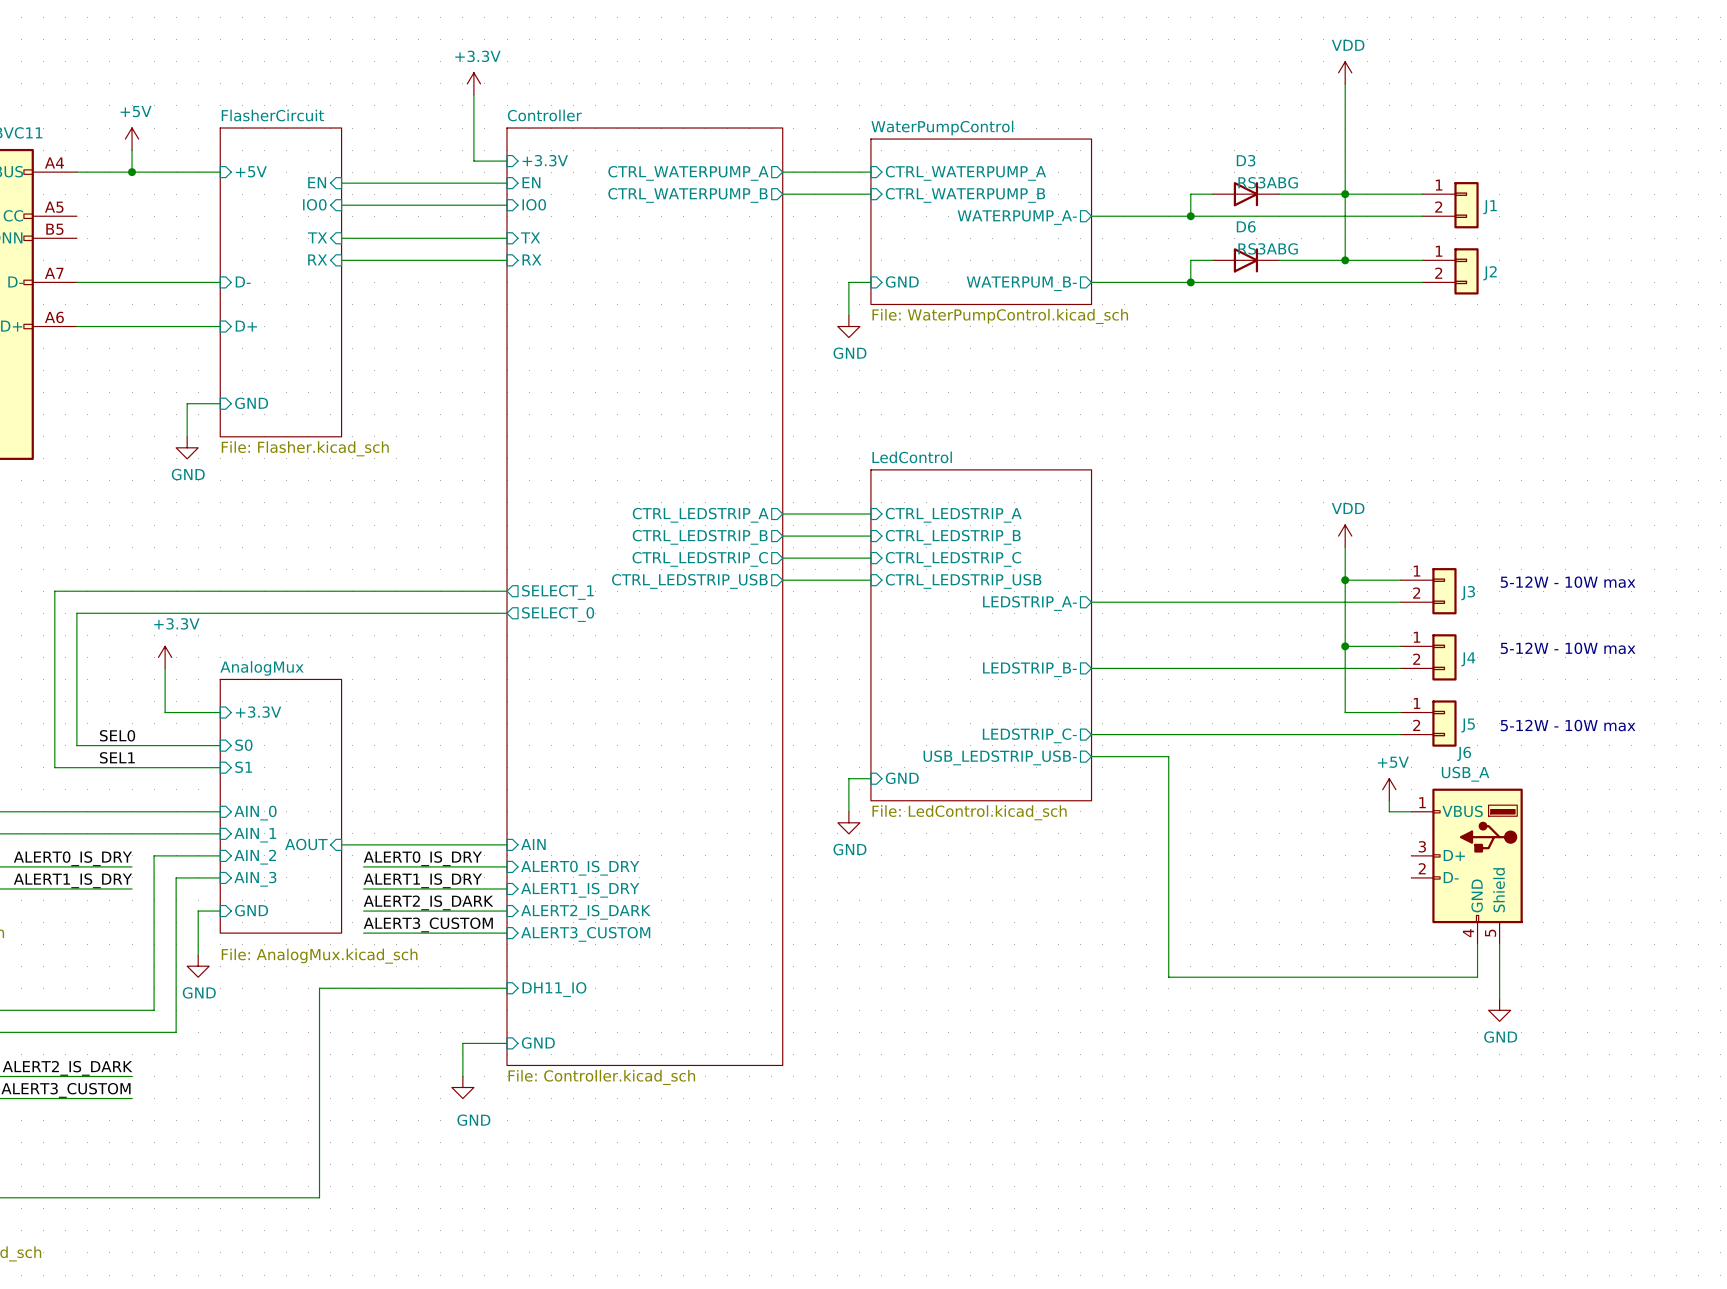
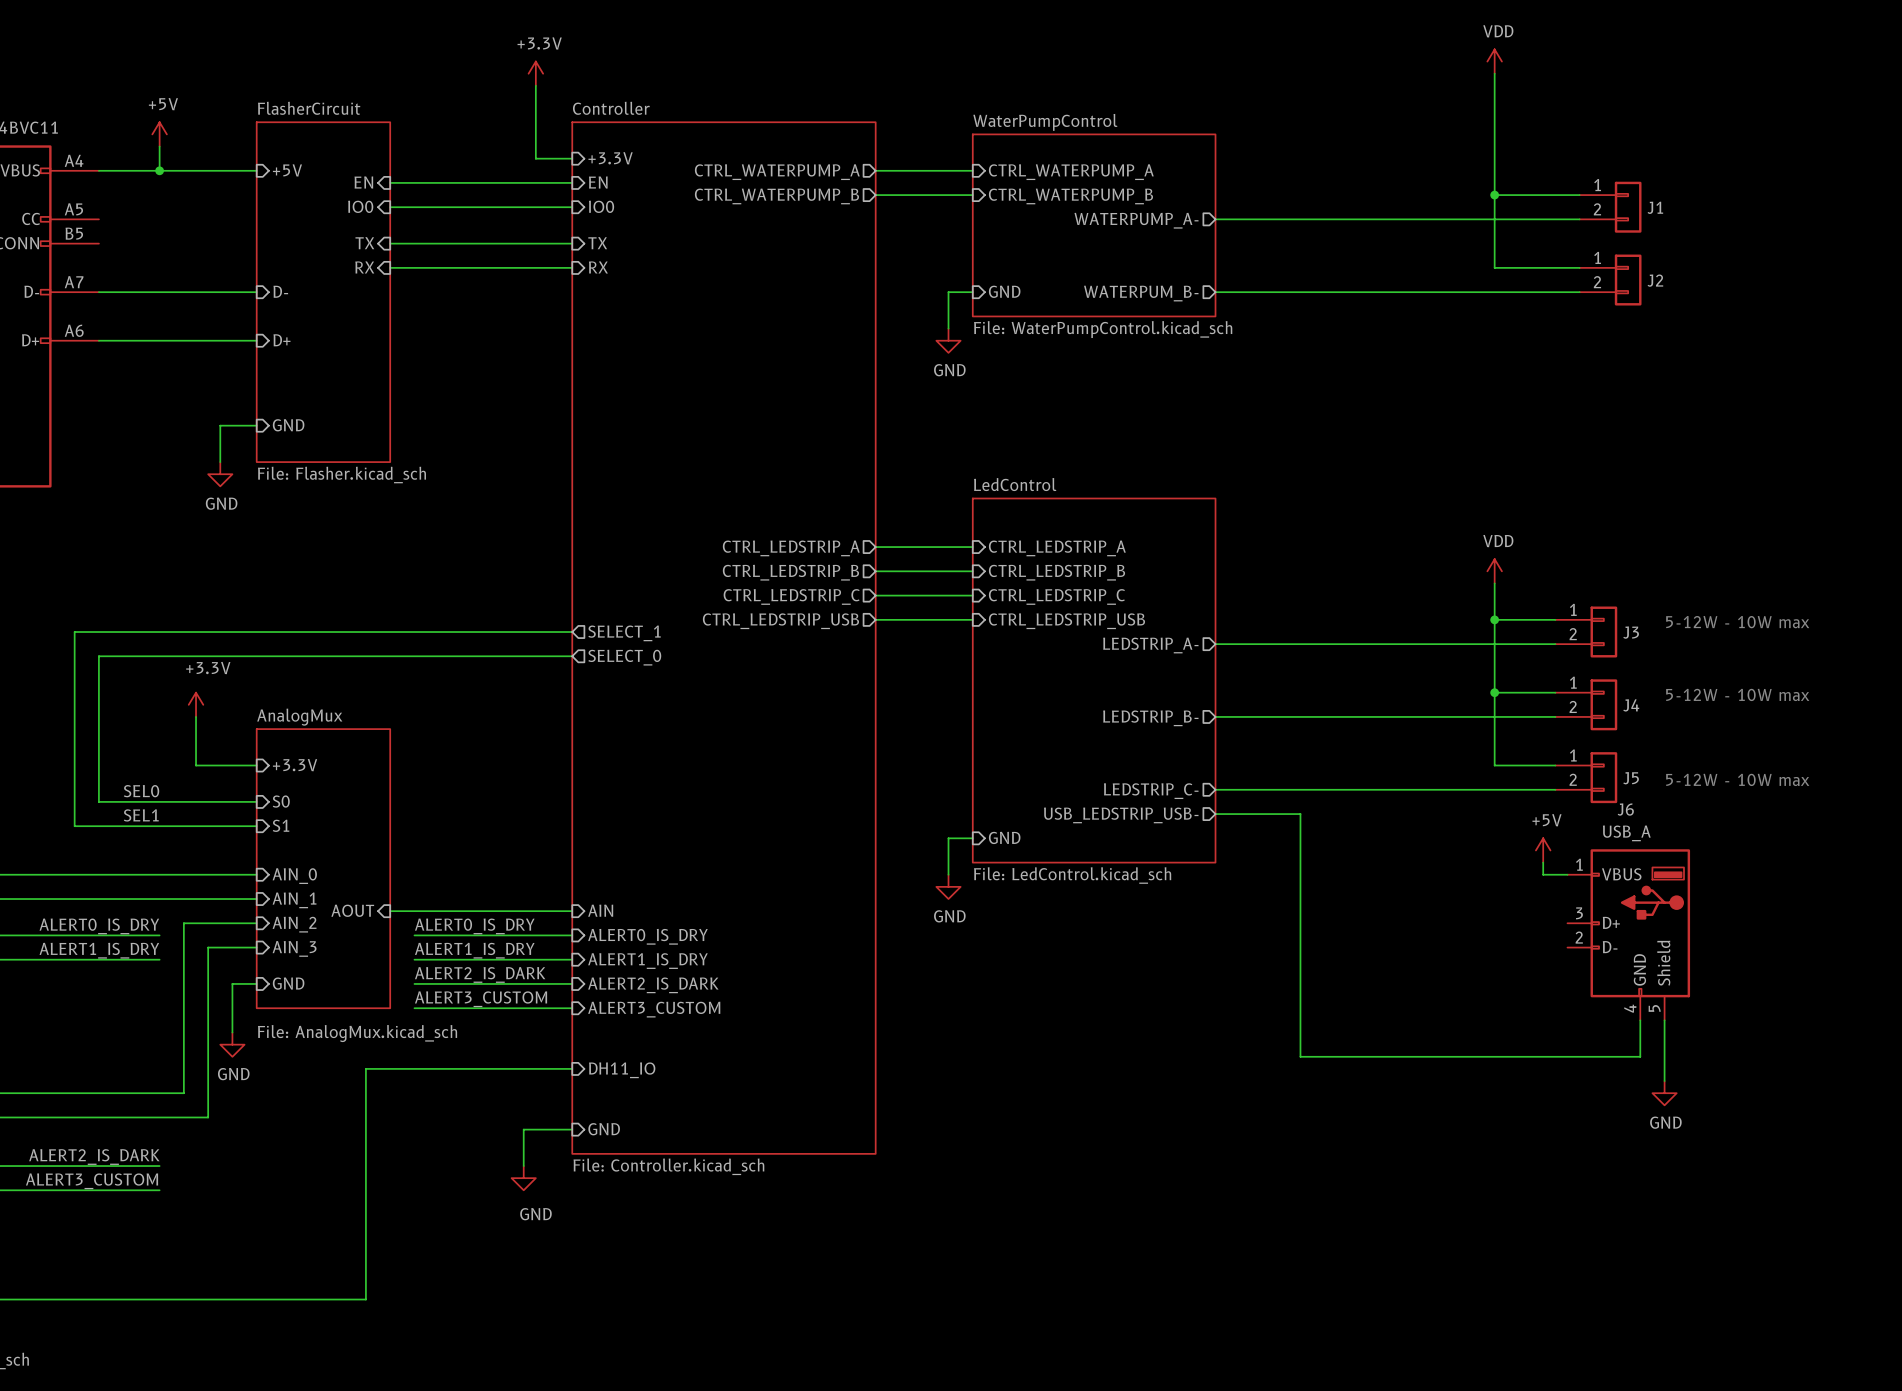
wire: (1212, 194) (1190, 194) (1190, 216) -> none
D3: RS3ABG (1245, 194) -> none
wire: (1279, 194) (1345, 194) -> none
junction: (1190, 216) -> none
wire: (1212, 260) (1190, 260) (1190, 282) -> none
D6: RS3ABG (1245, 260) -> none
wire: (1279, 260) (1345, 260) -> none
junction: (1345, 260) -> none
junction: (1190, 282) -> none

